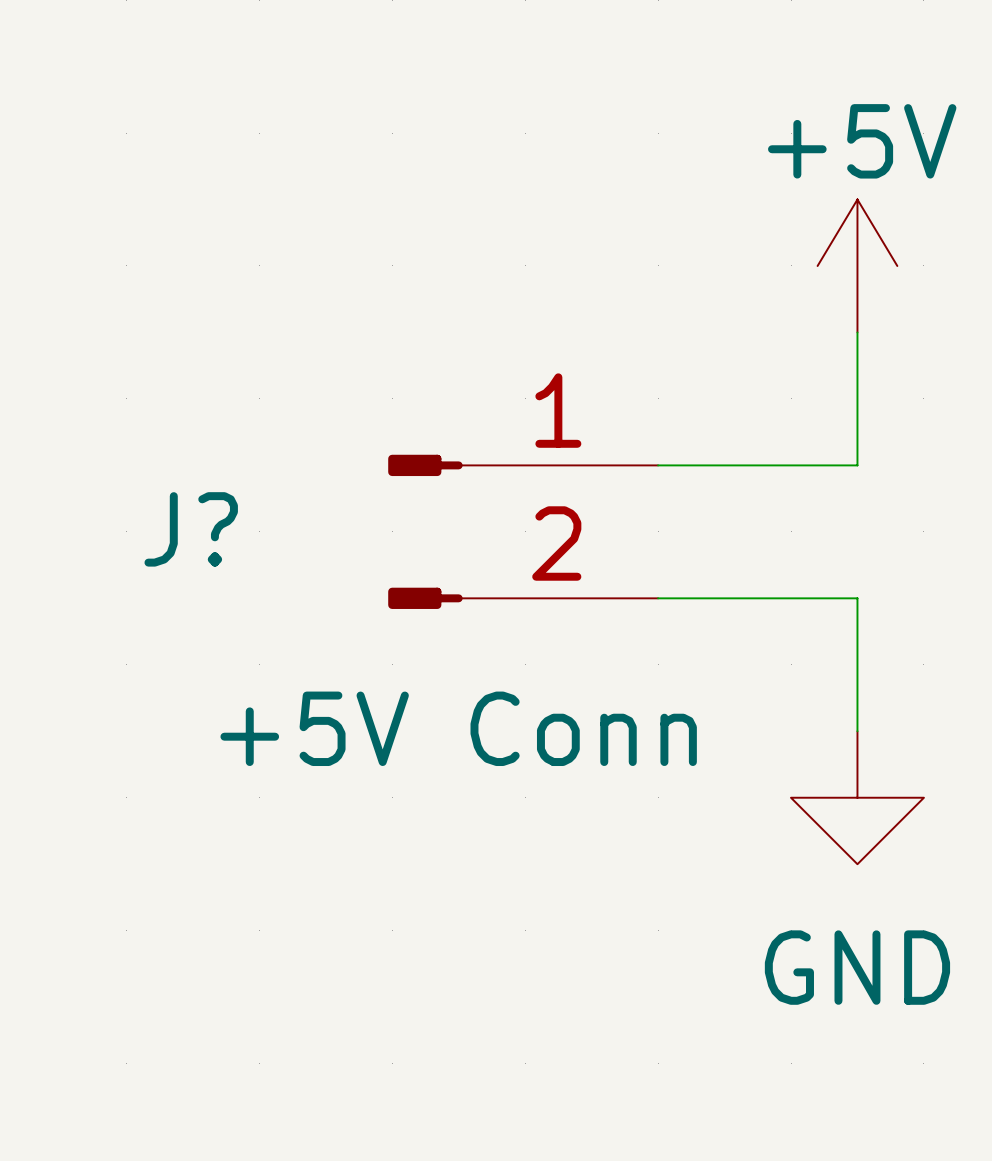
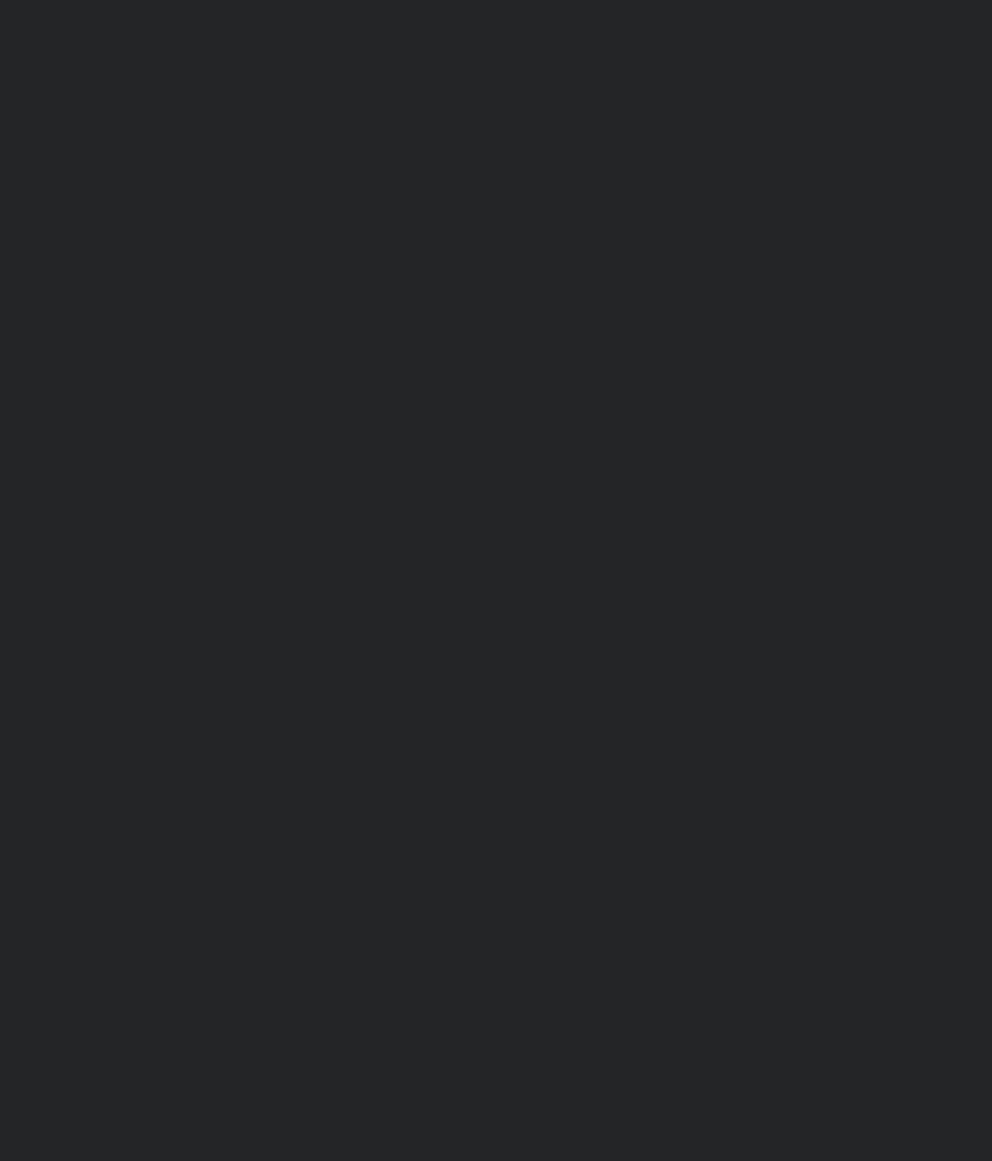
power symbol: +5V (857, 265) -> none
wire: (857, 332) (857, 465) (658, 465) -> none
J?: +5V Conn (523, 531) -> none
wire: (658, 598) (857, 598) (857, 731) -> none
power symbol: GND (857, 797) -> none

